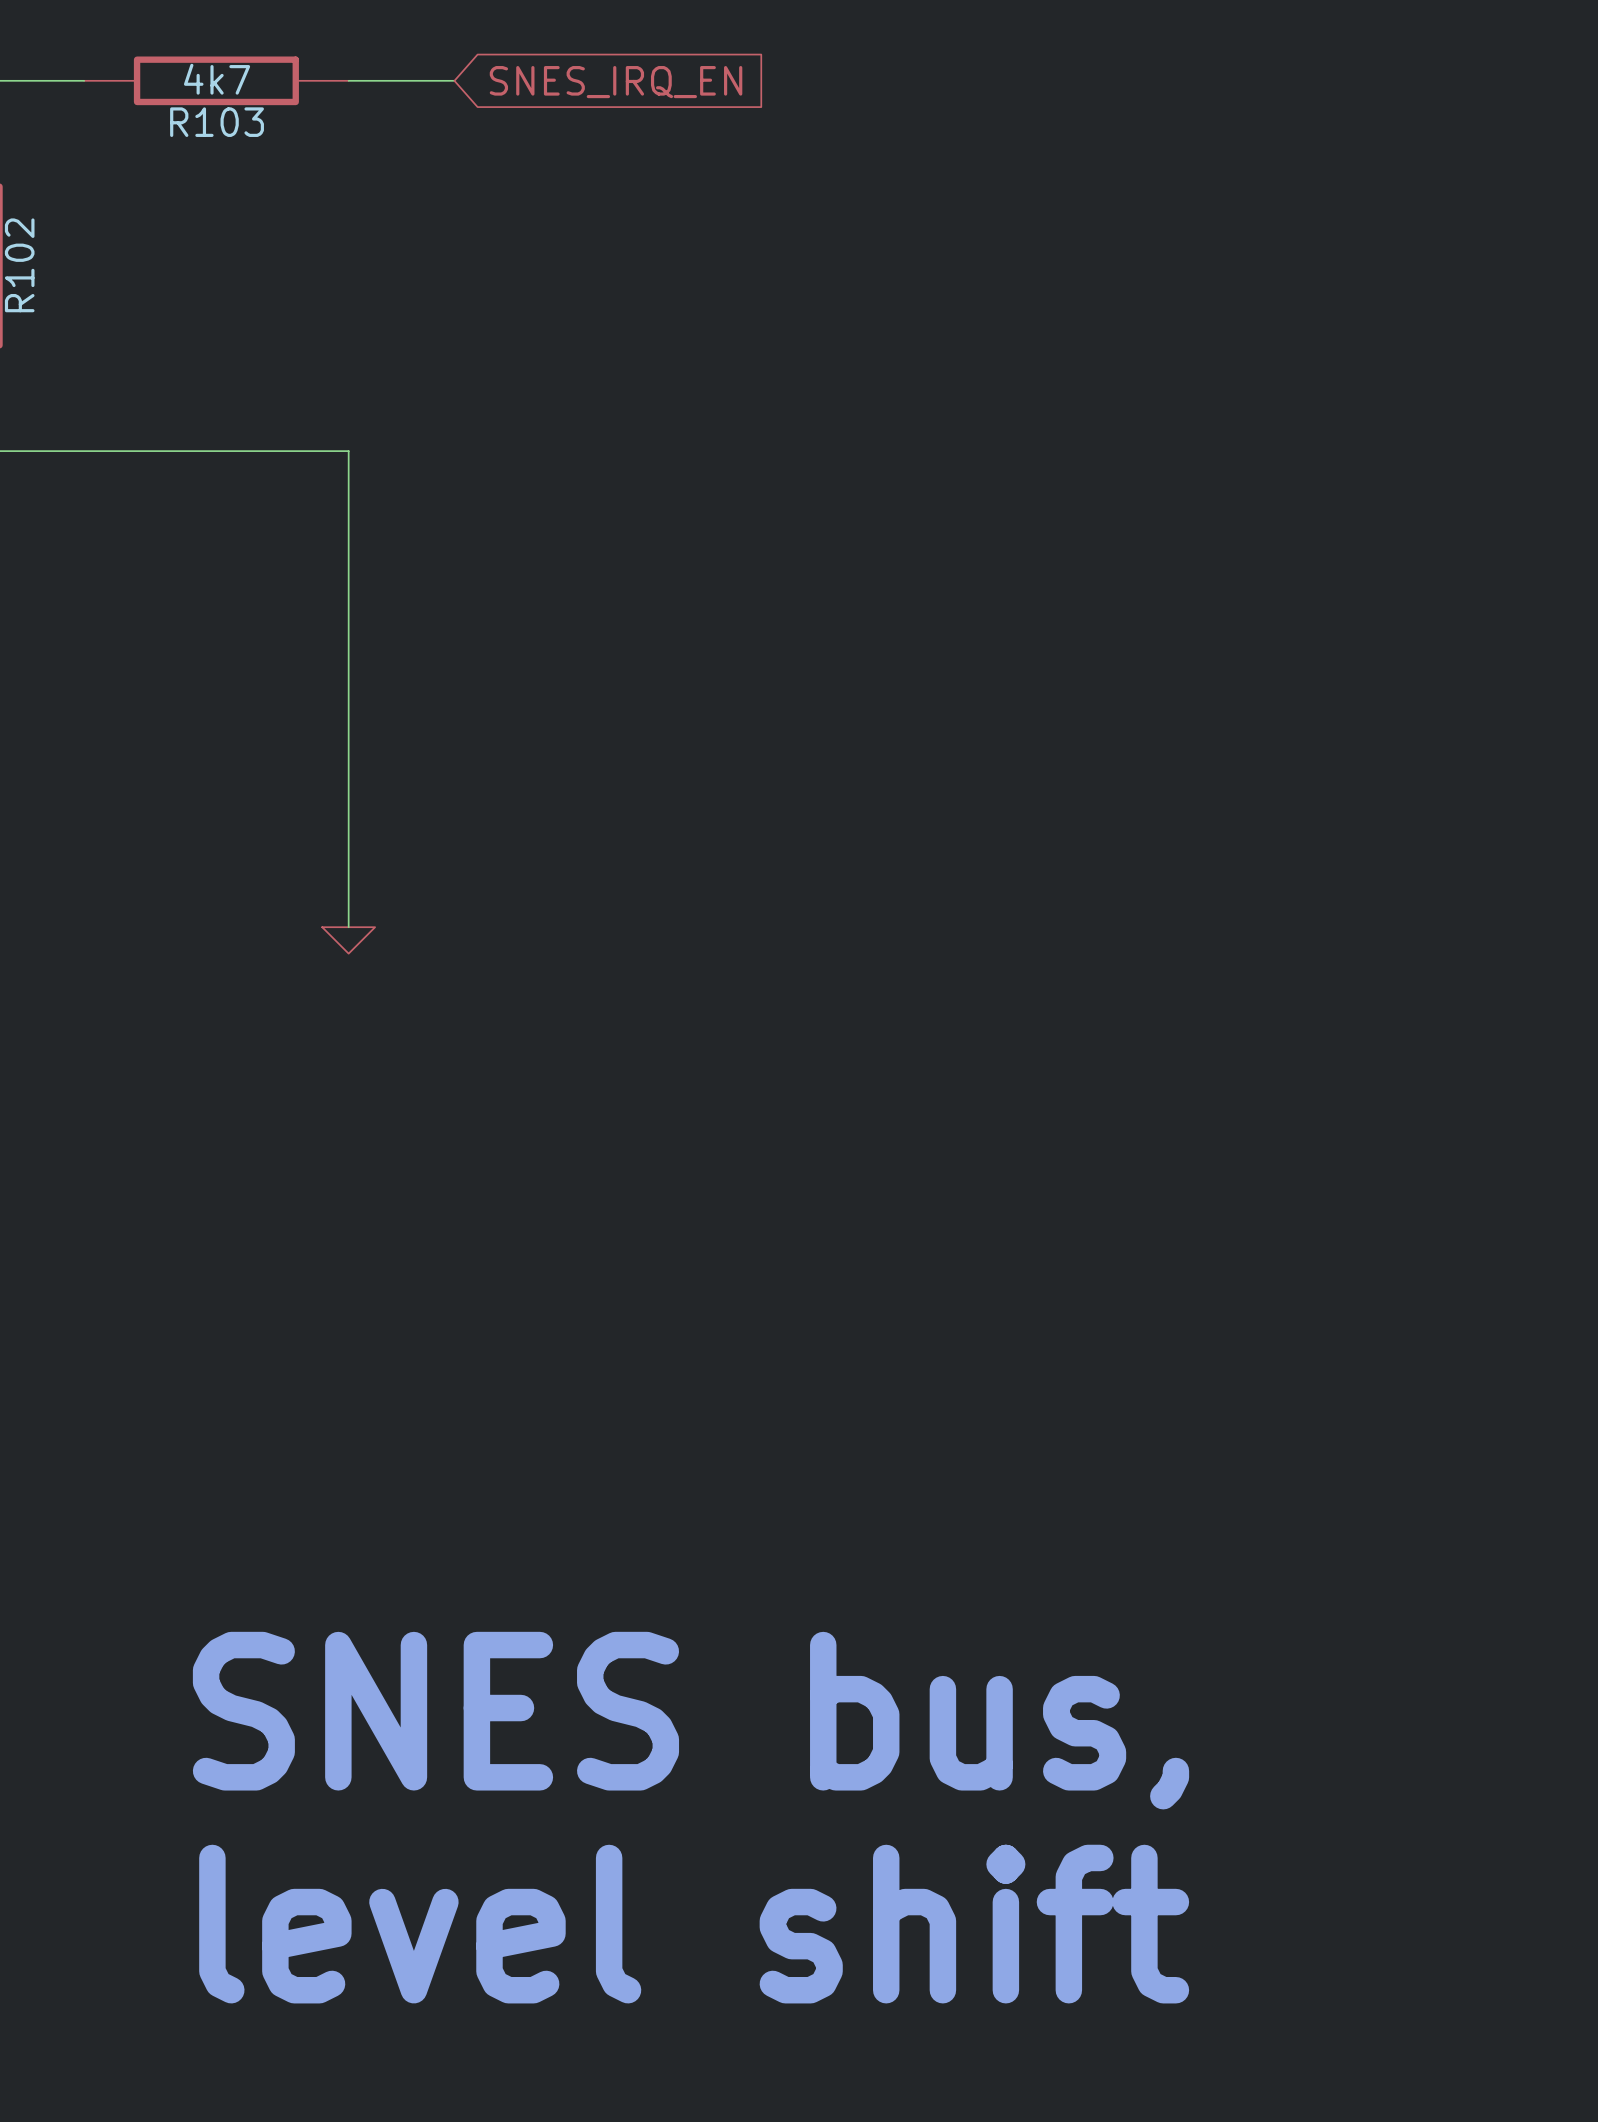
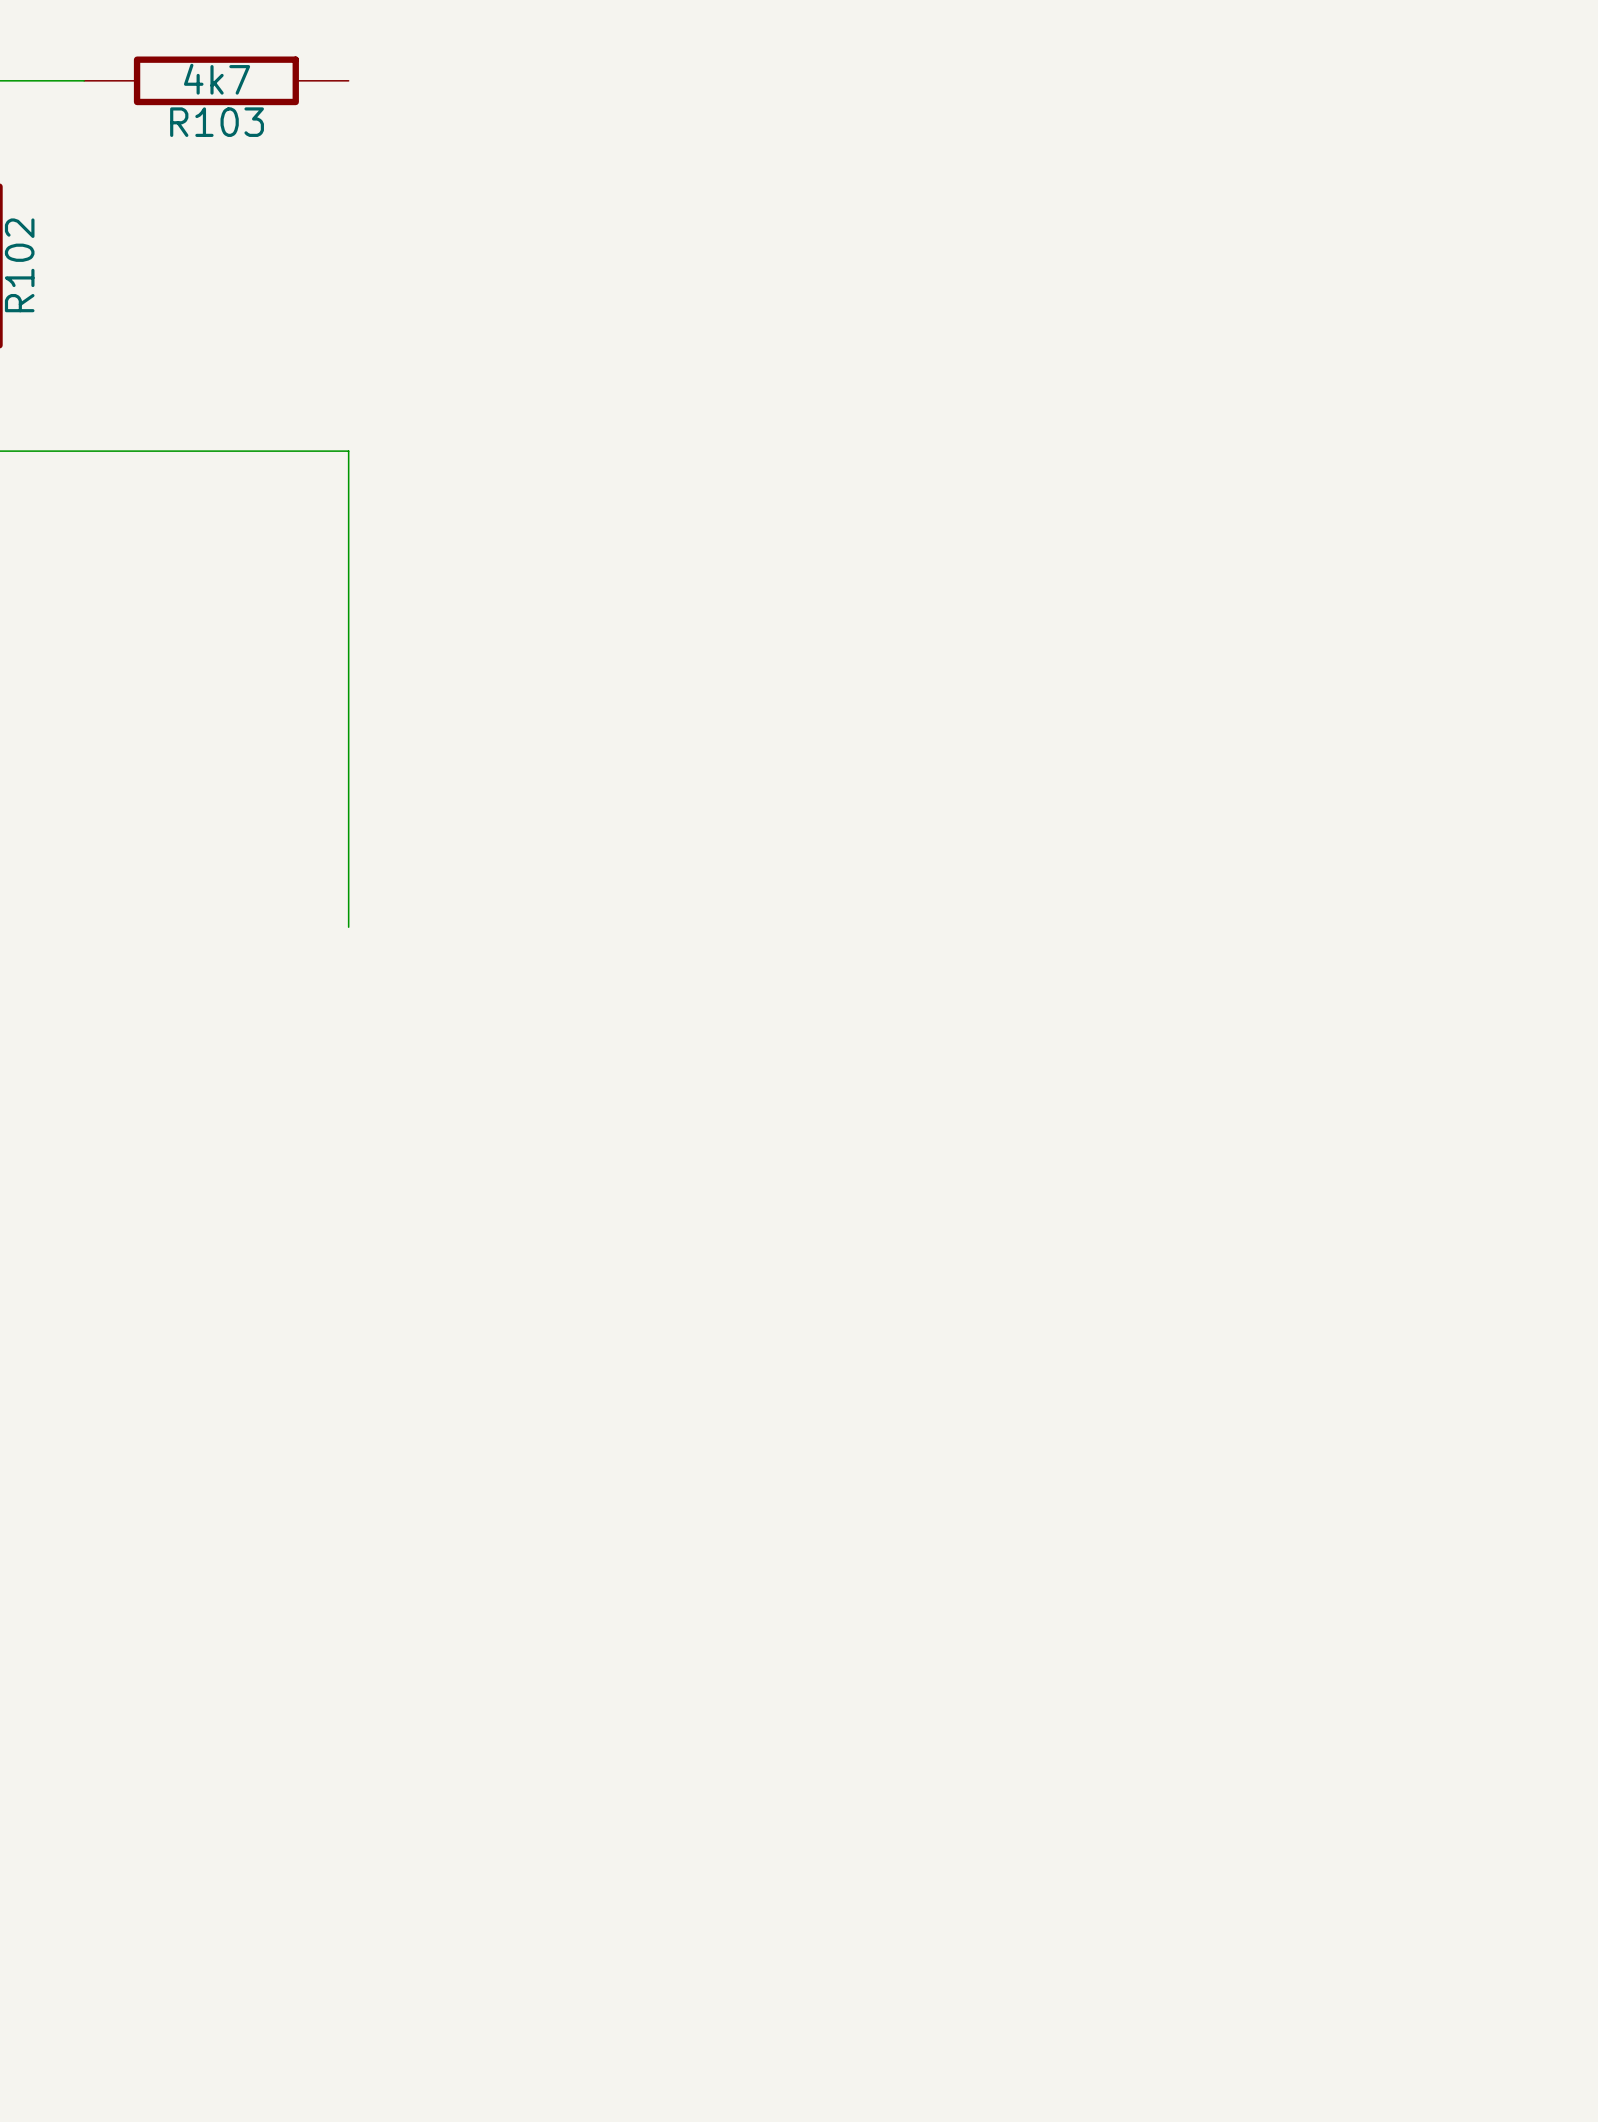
wire: (348, 80) (454, 80) -> none
global label: SNES_IRQ_EN (616, 82) -> none
power symbol: (348, 940) -> none
text: SNES bus, (691, 1720) -> none
text: level shift (694, 1924) -> none

